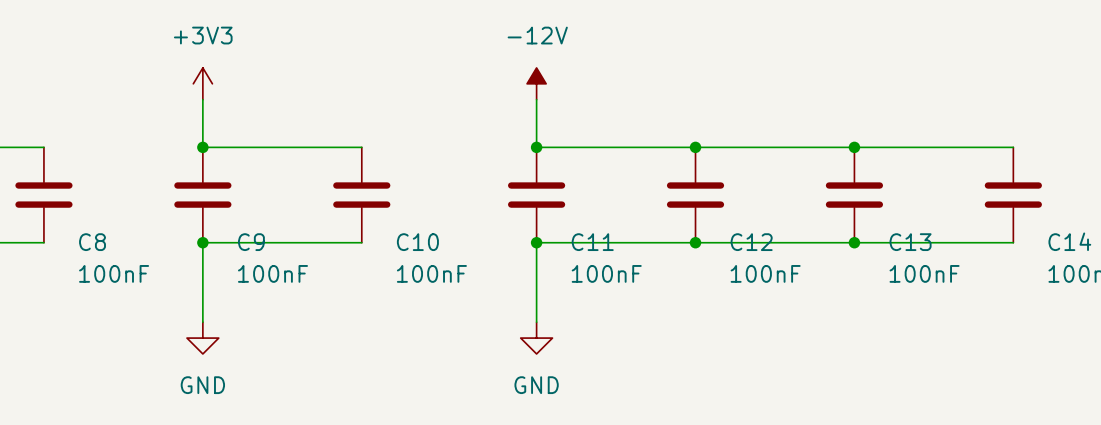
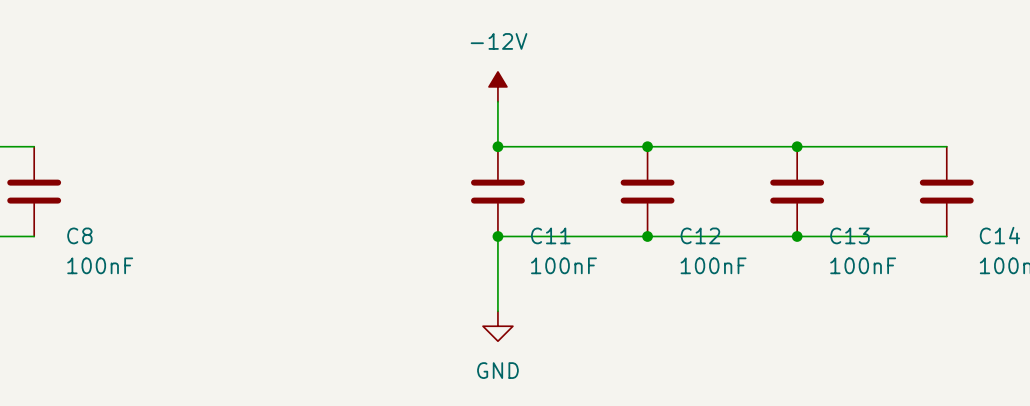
power symbol: +3V3 (202, 83) -> none
wire: (202, 99) (202, 147) (361, 147) -> none
junction: (202, 147) -> none
C9: 100nF (202, 195) -> none
C10: 100nF (361, 195) -> none
junction: (202, 242) -> none
wire: (361, 242) (202, 242) (202, 322) -> none
power symbol: GND (202, 338) -> none

